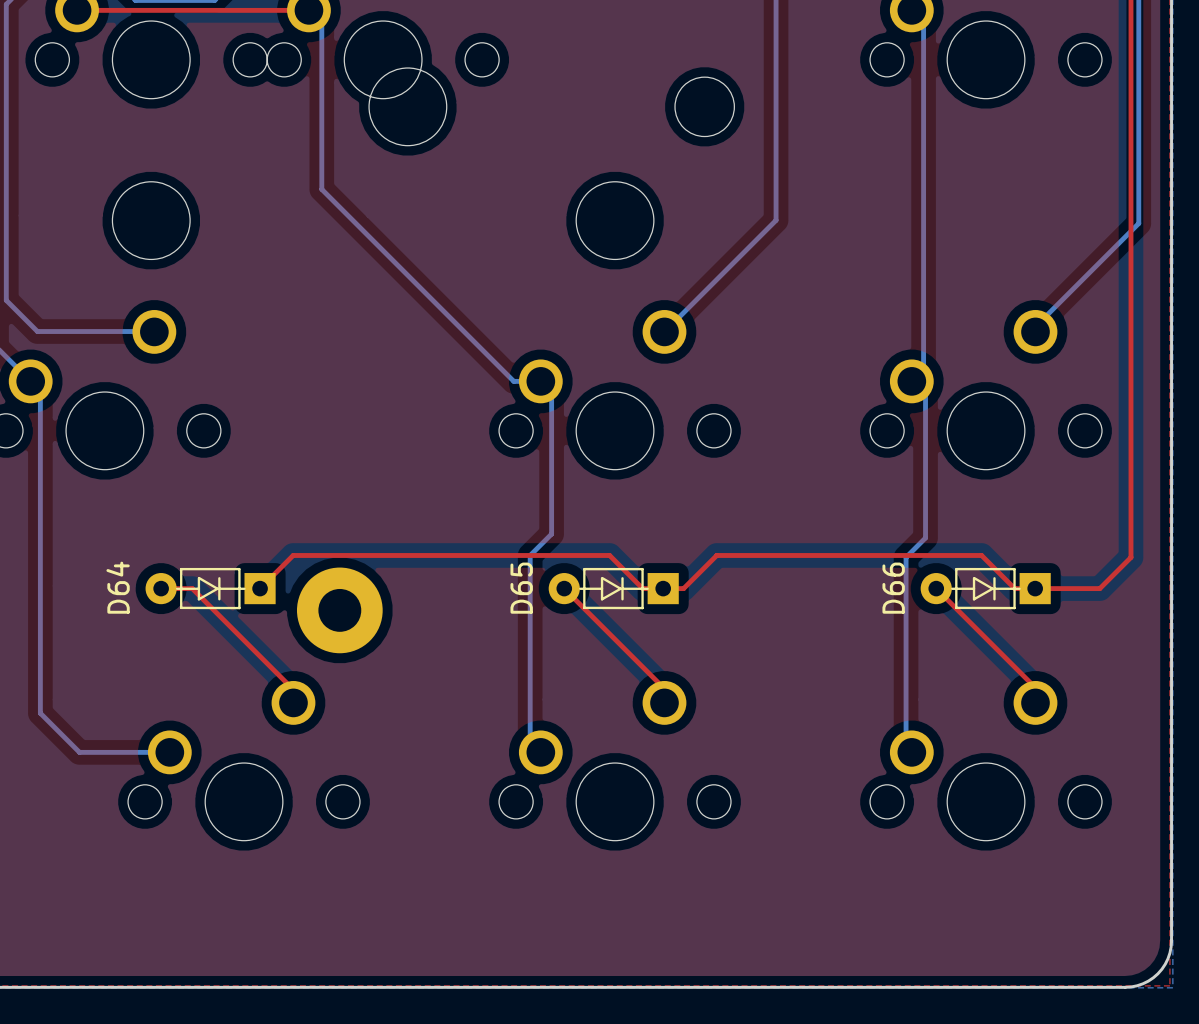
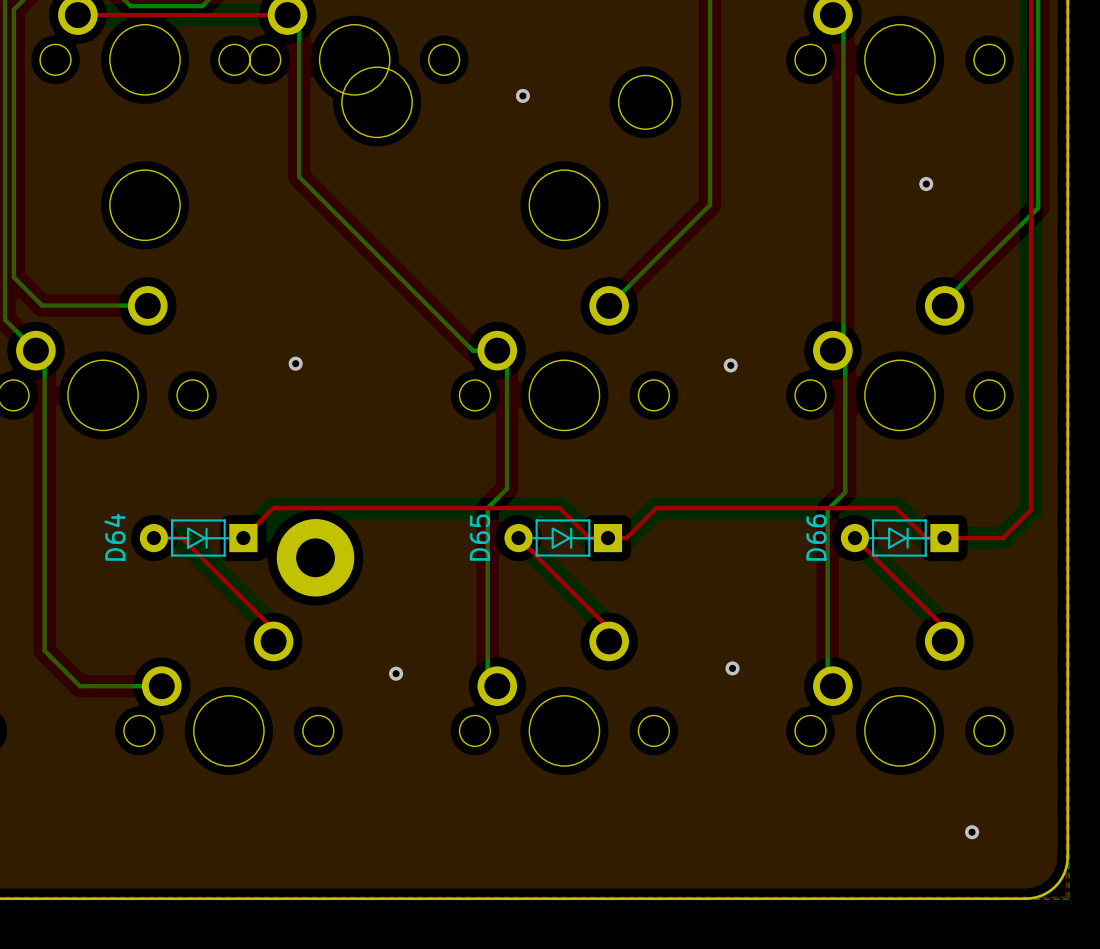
via: none -> (522, 95)
via: none -> (926, 184)
via: none -> (295, 363)
via: none -> (730, 365)
via: none -> (732, 668)
via: none -> (396, 673)
via: none -> (972, 832)

